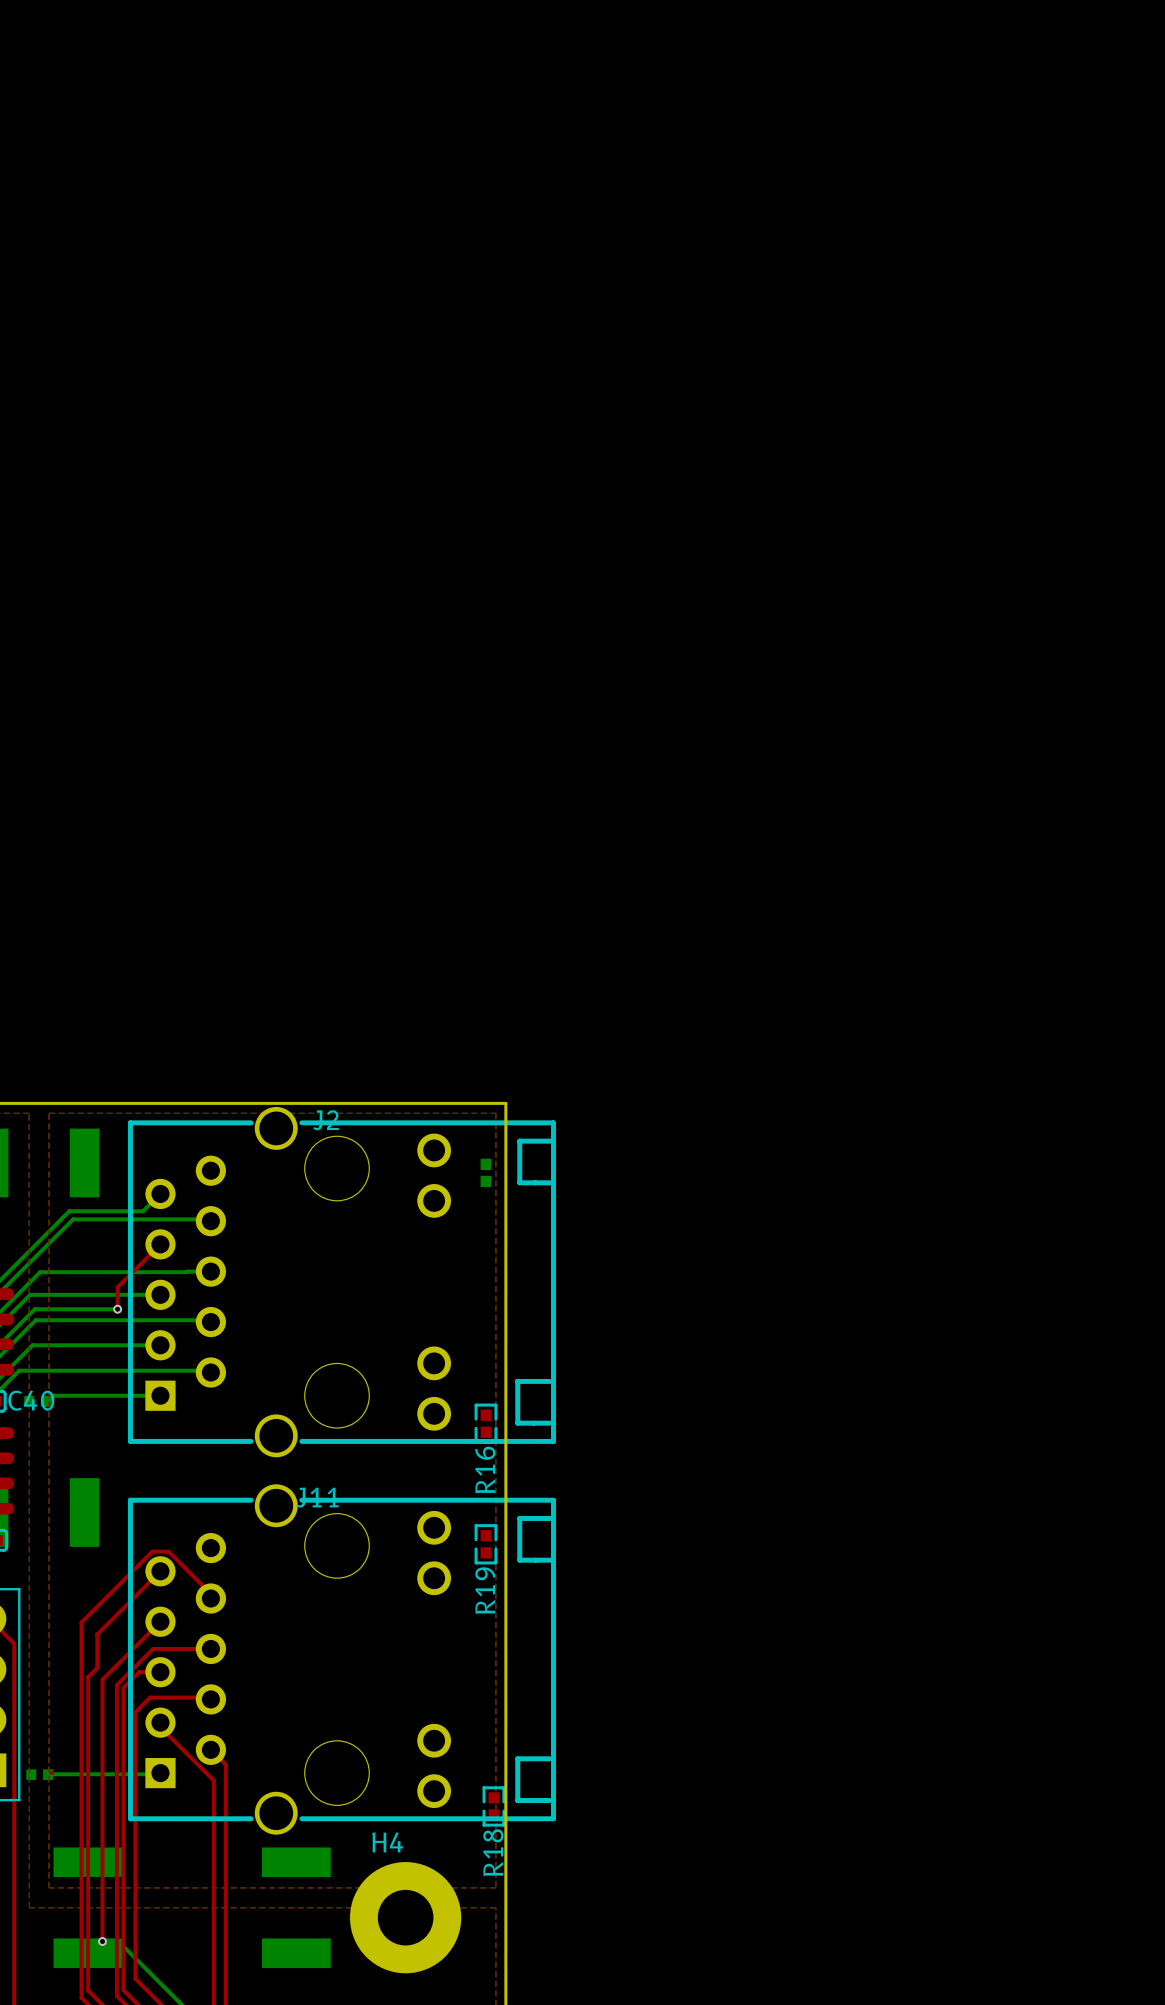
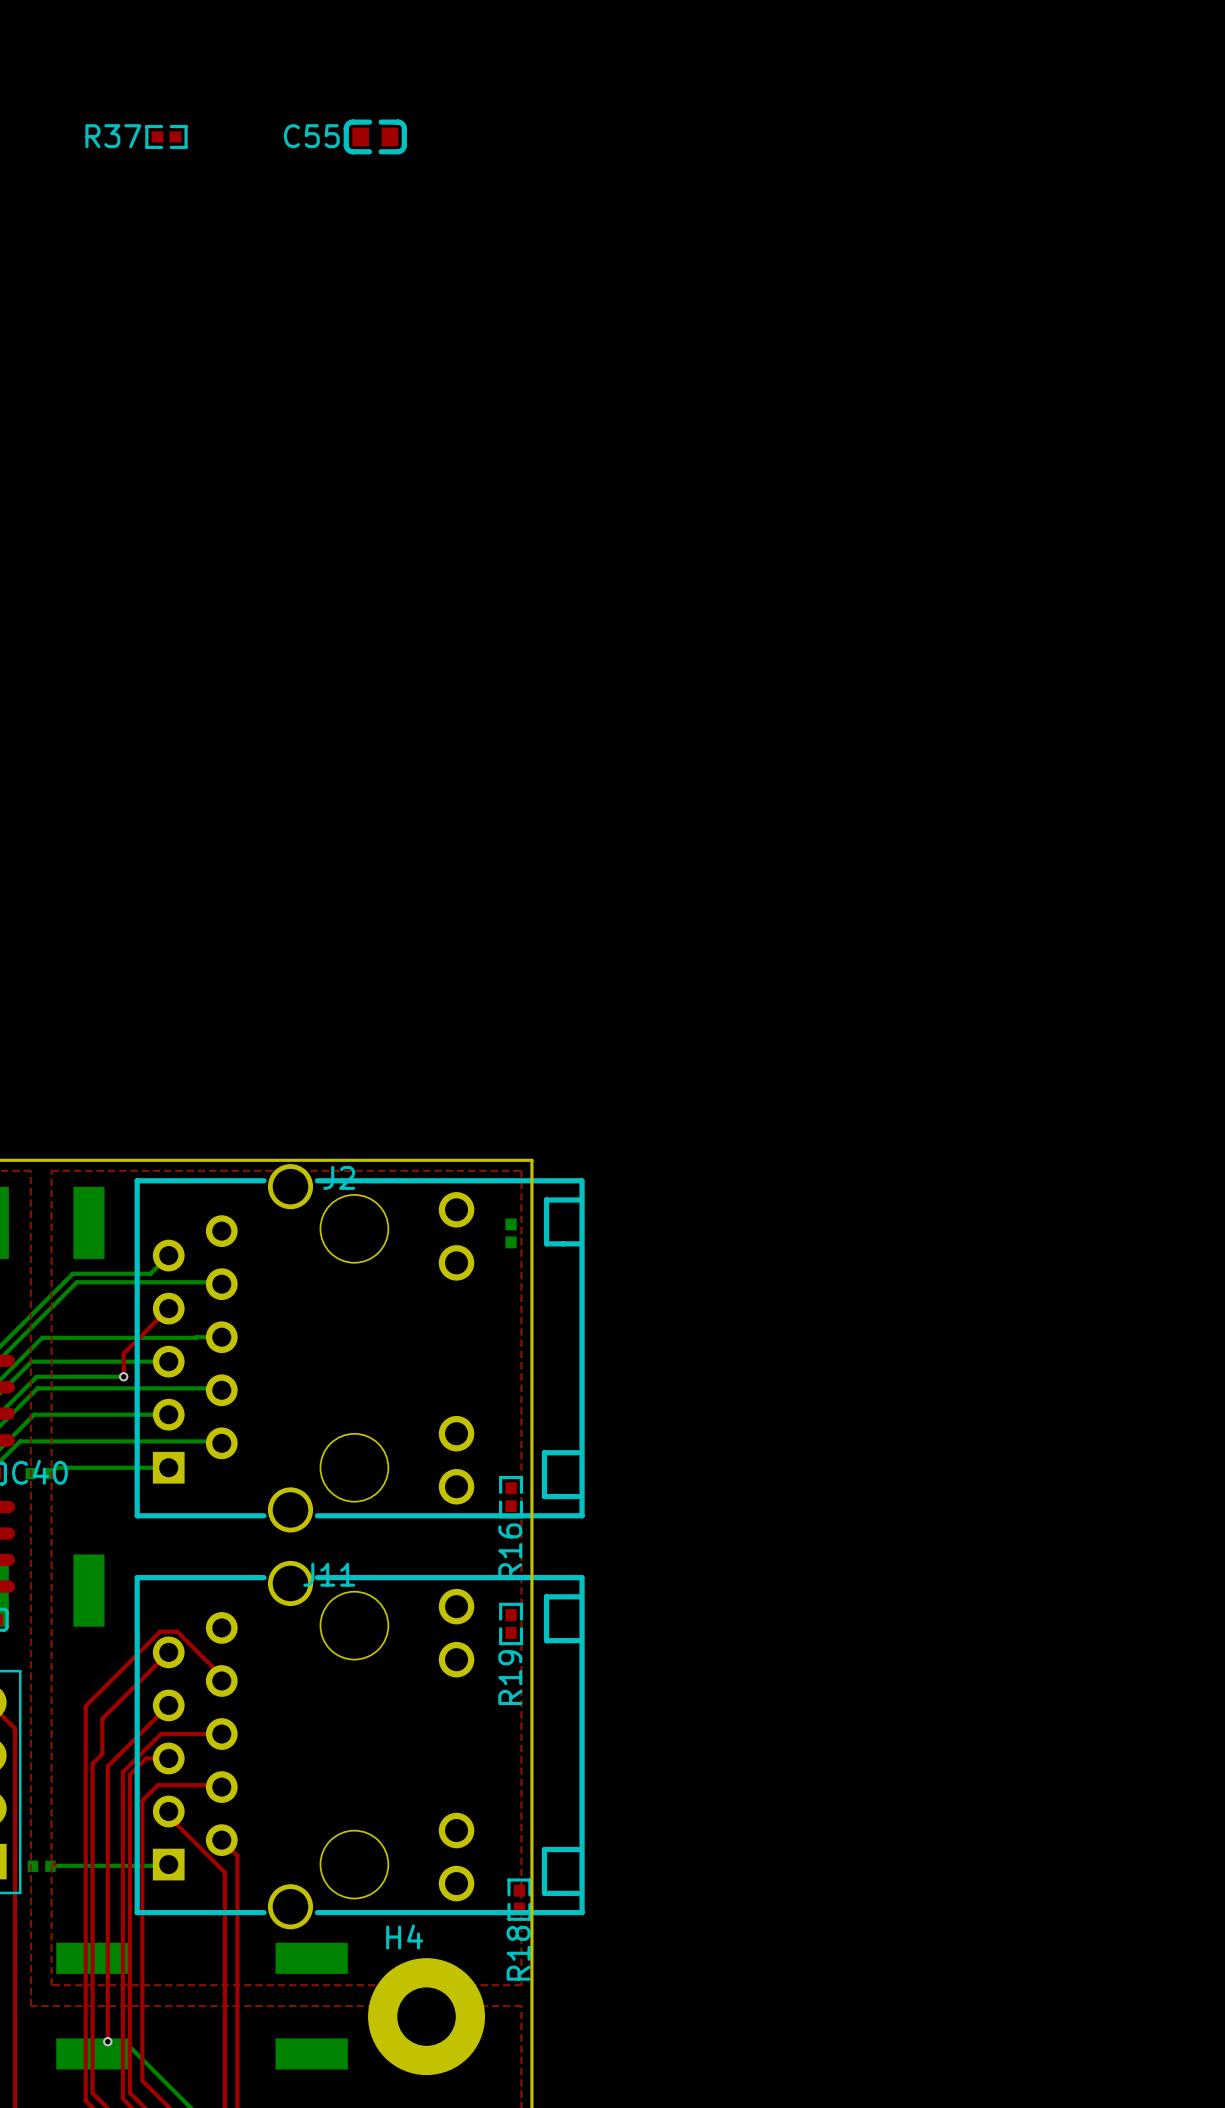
R37: none -> (166, 136)
C55: none -> (375, 136)

